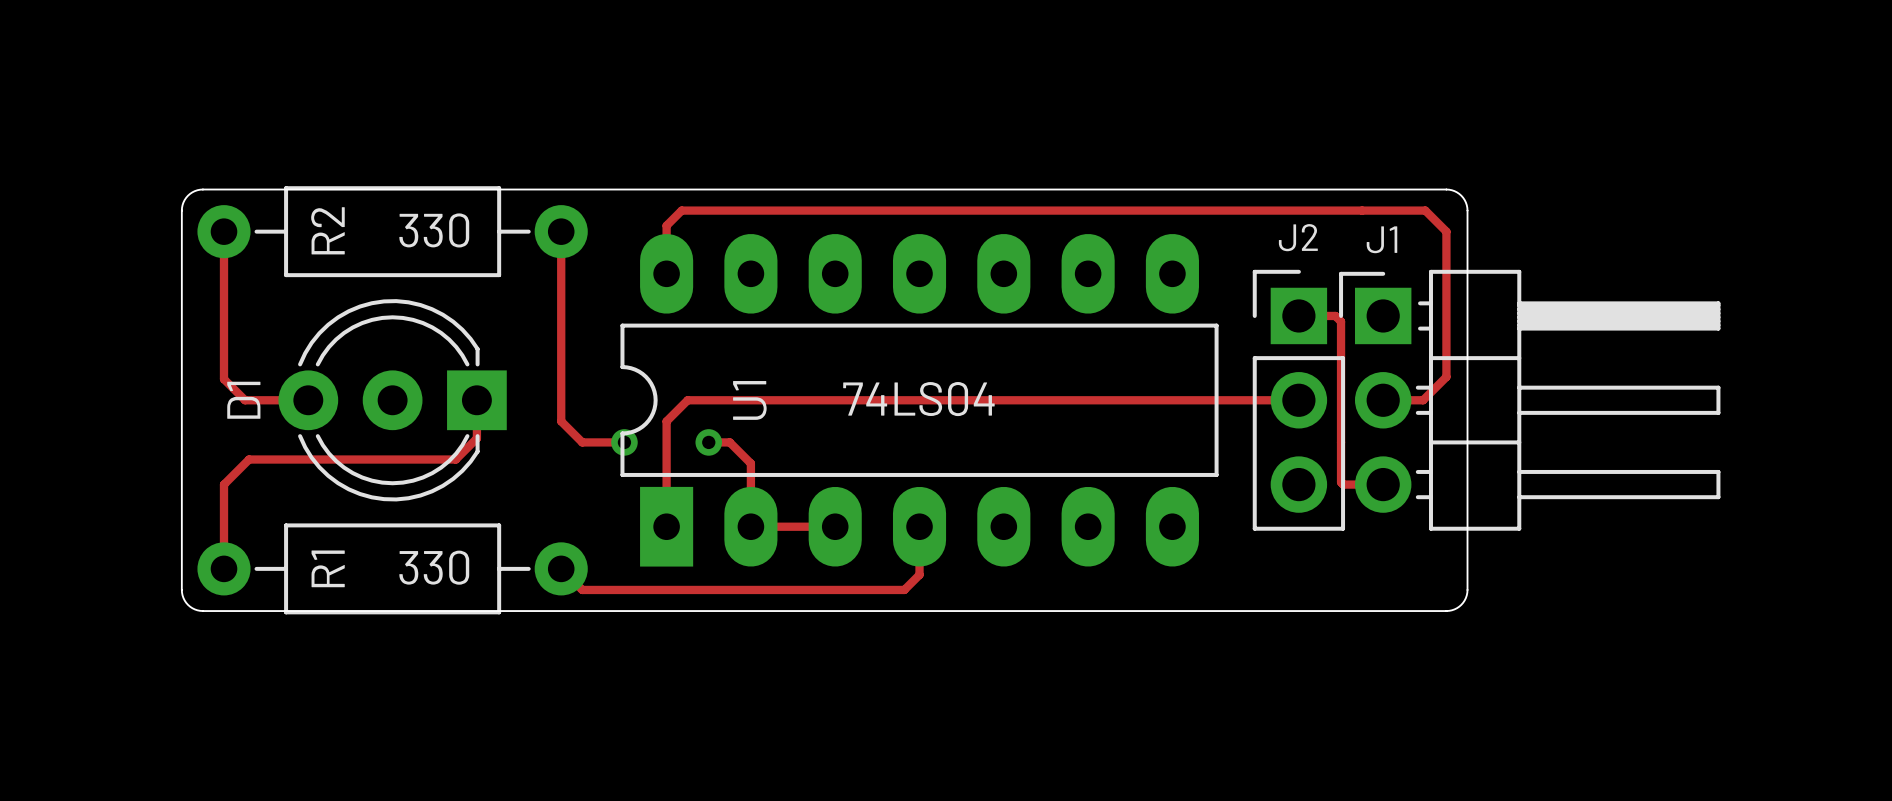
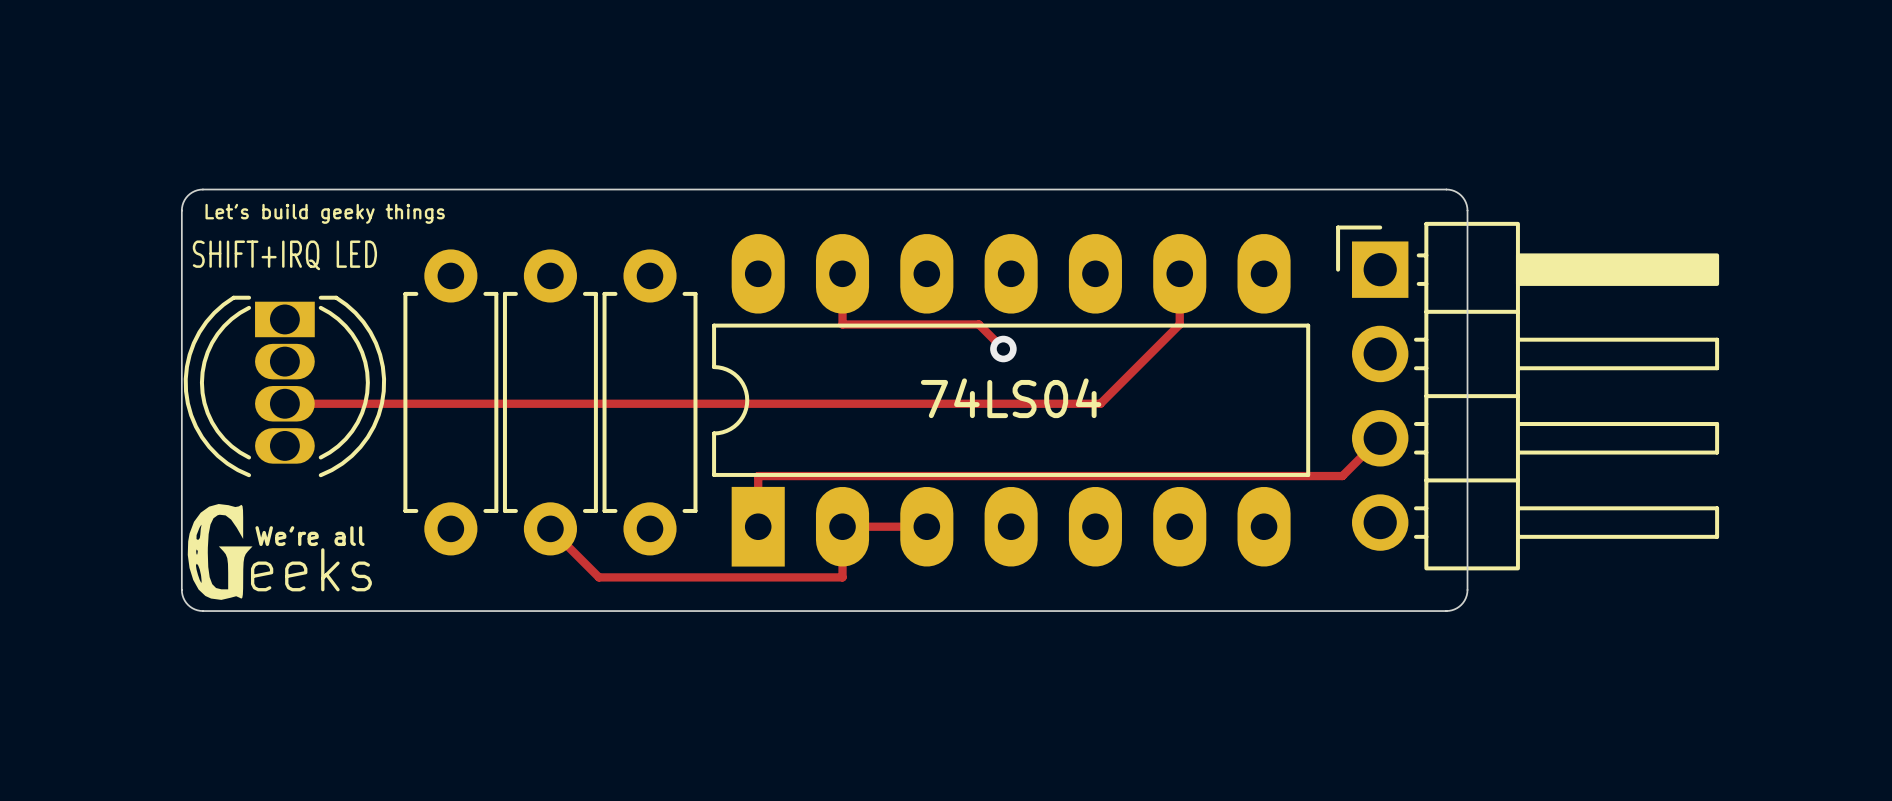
text: none -> Let's build geeky things (325, 213)
track: (224, 231) (224, 379) (245, 400) (308, 400) -> none
R2: 330 (392, 231) -> none
track: (561, 231) (561, 421) (582, 442) (624, 442) -> none
text: none -> SHIFT+IRQ LED (284, 255)
track: (666, 273) (666, 225) (681, 210) (1425, 210) (1446, 231) (1446, 376) (1423, 400) (1383, 400) -> none
track: none -> (842, 273) (842, 324) (978, 324) (1003, 349)
track: none -> (1179, 273) (1179, 324) (1100, 403) (284, 403)
track: (1298, 315) (1335, 315) (1341, 321) (1341, 482) (1343, 484) (1383, 484) -> none
via: none -> (1003, 349)
part: none -> (284, 386)
part: none -> (1527, 396)
D1: (392, 400) -> none
track: (476, 400) (476, 438) (455, 459) (249, 459) (224, 484) (224, 568) -> none
U1: 74LS04 (919, 400) -> none
part: none -> 74LS04 (1011, 400)
track: (1298, 400) (687, 400) (666, 421) (666, 526) -> none
J2: (1298, 400) -> none
J1: (1529, 400) -> none
part: none -> (450, 402)
part: none -> (550, 402)
part: none -> (650, 402)
track: none -> (1380, 438) (1342, 476) (758, 476) (758, 526)
via: (624, 442) -> none
track: (708, 442) (729, 442) (750, 463) (750, 526) (835, 526) -> none
via: (708, 442) -> none
drawing: none -> [187, 504, 253, 600]
track: (919, 526) (919, 574) (904, 589) (582, 589) (561, 568) -> none
track: none -> (926, 526) (842, 526) (842, 577) (598, 577) (550, 528)
text: none -> We're all (310, 536)
R1: 330 (392, 568) -> none
text: none -> eeks (311, 569)

